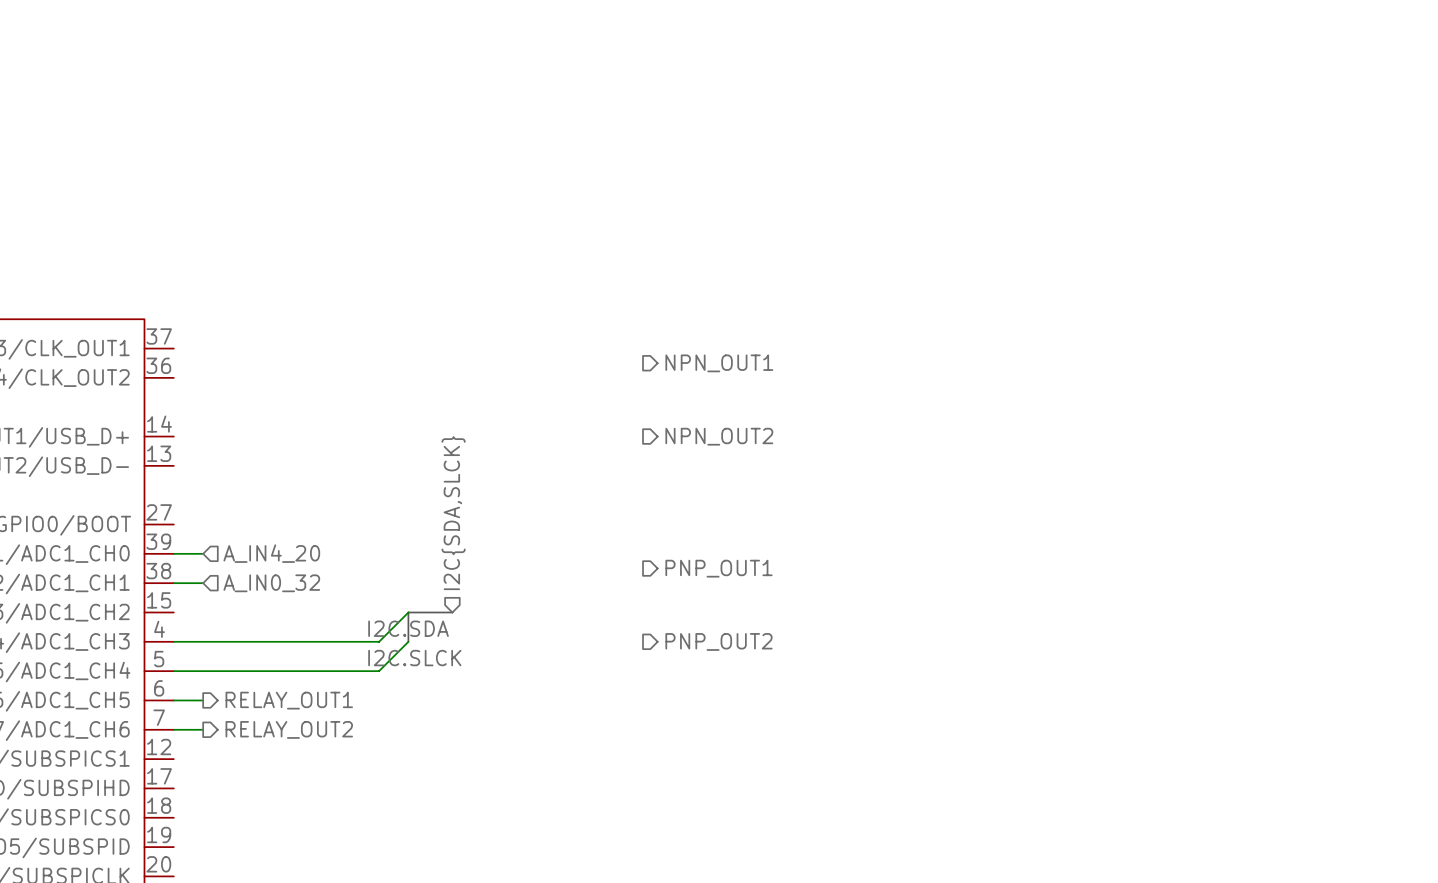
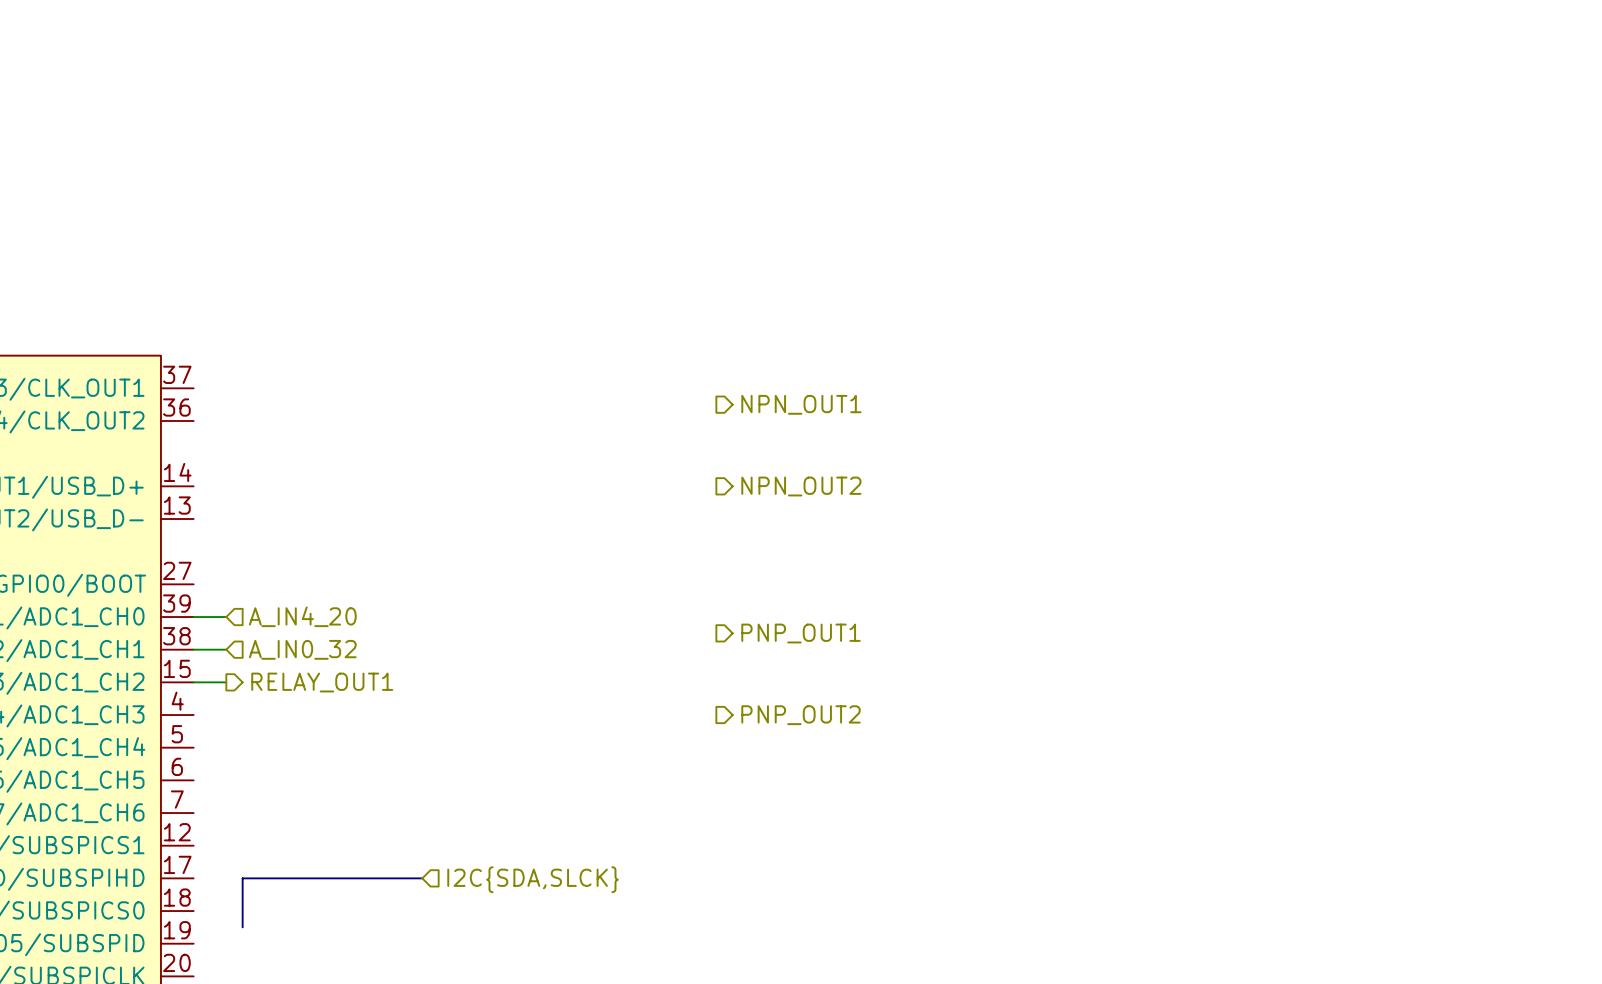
hierarchical label rotation: 0° (453, 513) -> 90° clockwise (533, 879)
hierarchical label position: I2C{SDA,SLCK} (453, 513) -> I2C{SDA,SLCK} (533, 879)
wire: (408, 612) (379, 641) (173, 641) -> none
bus: (452, 612) (408, 612) (408, 641) -> none
label: I2C.SDA (408, 628) -> none
wire: (408, 641) (379, 671) (173, 671) -> none
label: I2C.SLCK (414, 658) -> none
wire: (173, 700) (203, 700) -> (193, 682) (226, 682)
hierarchical label position: RELAY_OUT1 (289, 700) -> RELAY_OUT1 (322, 682)
wire: (173, 729) (203, 729) -> none
hierarchical label: RELAY_OUT2 (289, 729) -> none
bus: none -> (422, 878) (242, 878) (242, 927)

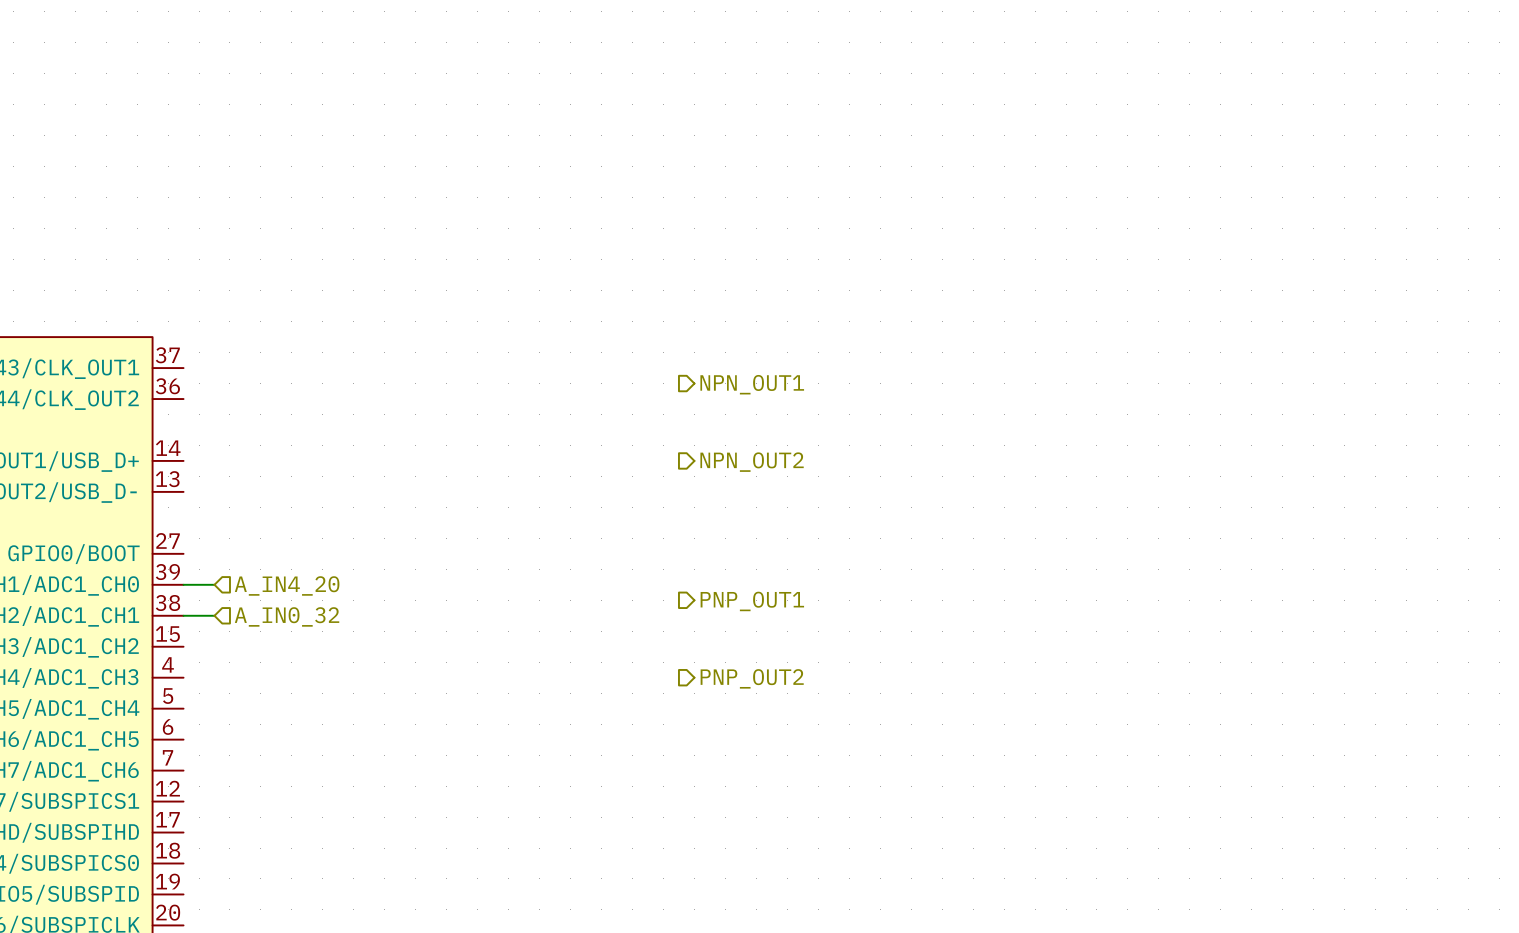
wire: (193, 682) (226, 682) -> none
hierarchical label: RELAY_OUT1 (322, 682) -> none
bus: (422, 878) (242, 878) (242, 927) -> none
hierarchical label: I2C{SDA,SLCK} (533, 879) -> none

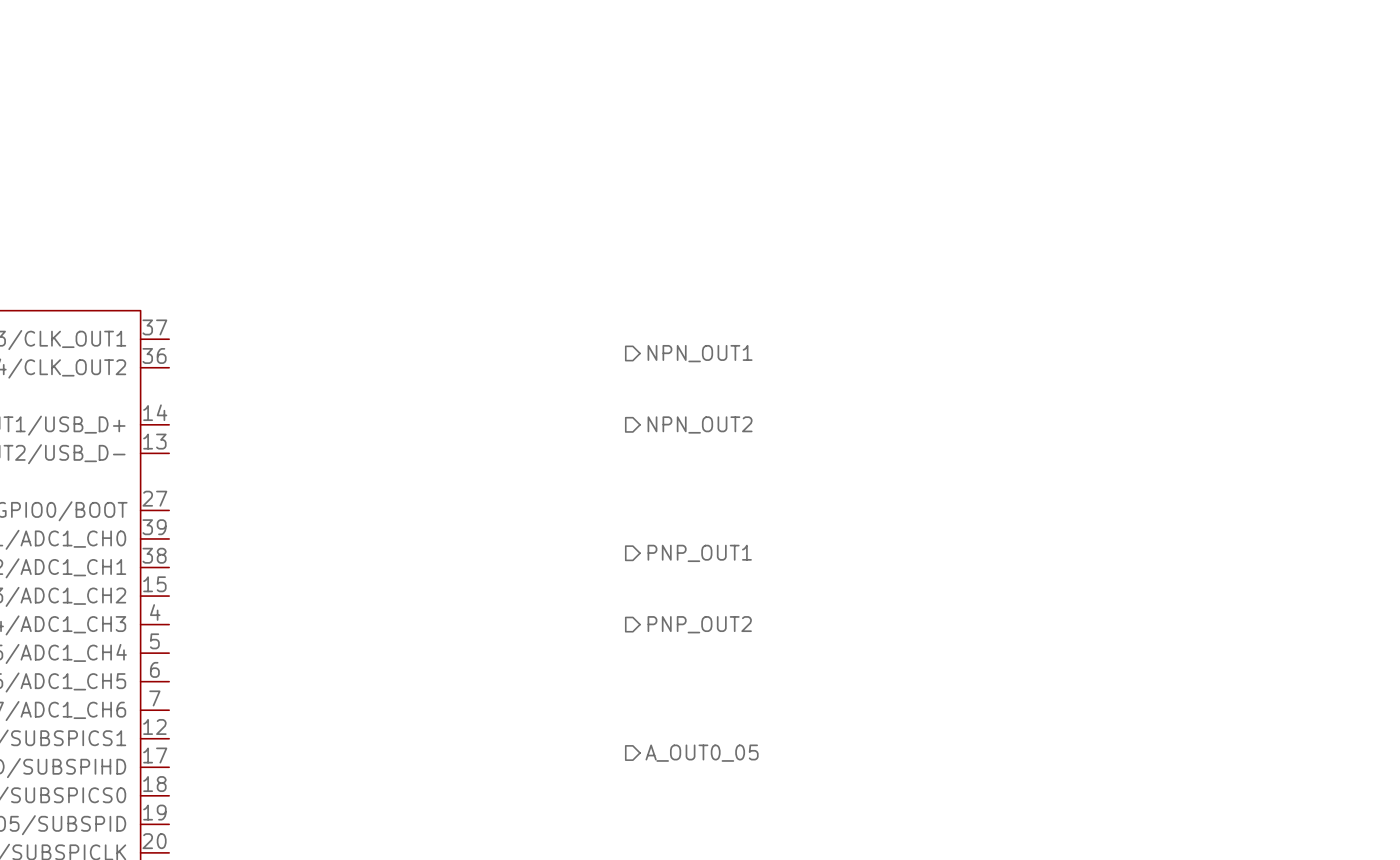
wire: (183, 584) (214, 584) -> none
hierarchical label: A_IN4_20 (287, 585) -> none
wire: (183, 615) (214, 615) -> none
hierarchical label: A_IN0_32 (287, 616) -> none
hierarchical label: none -> A_OUT0_05 (702, 753)

